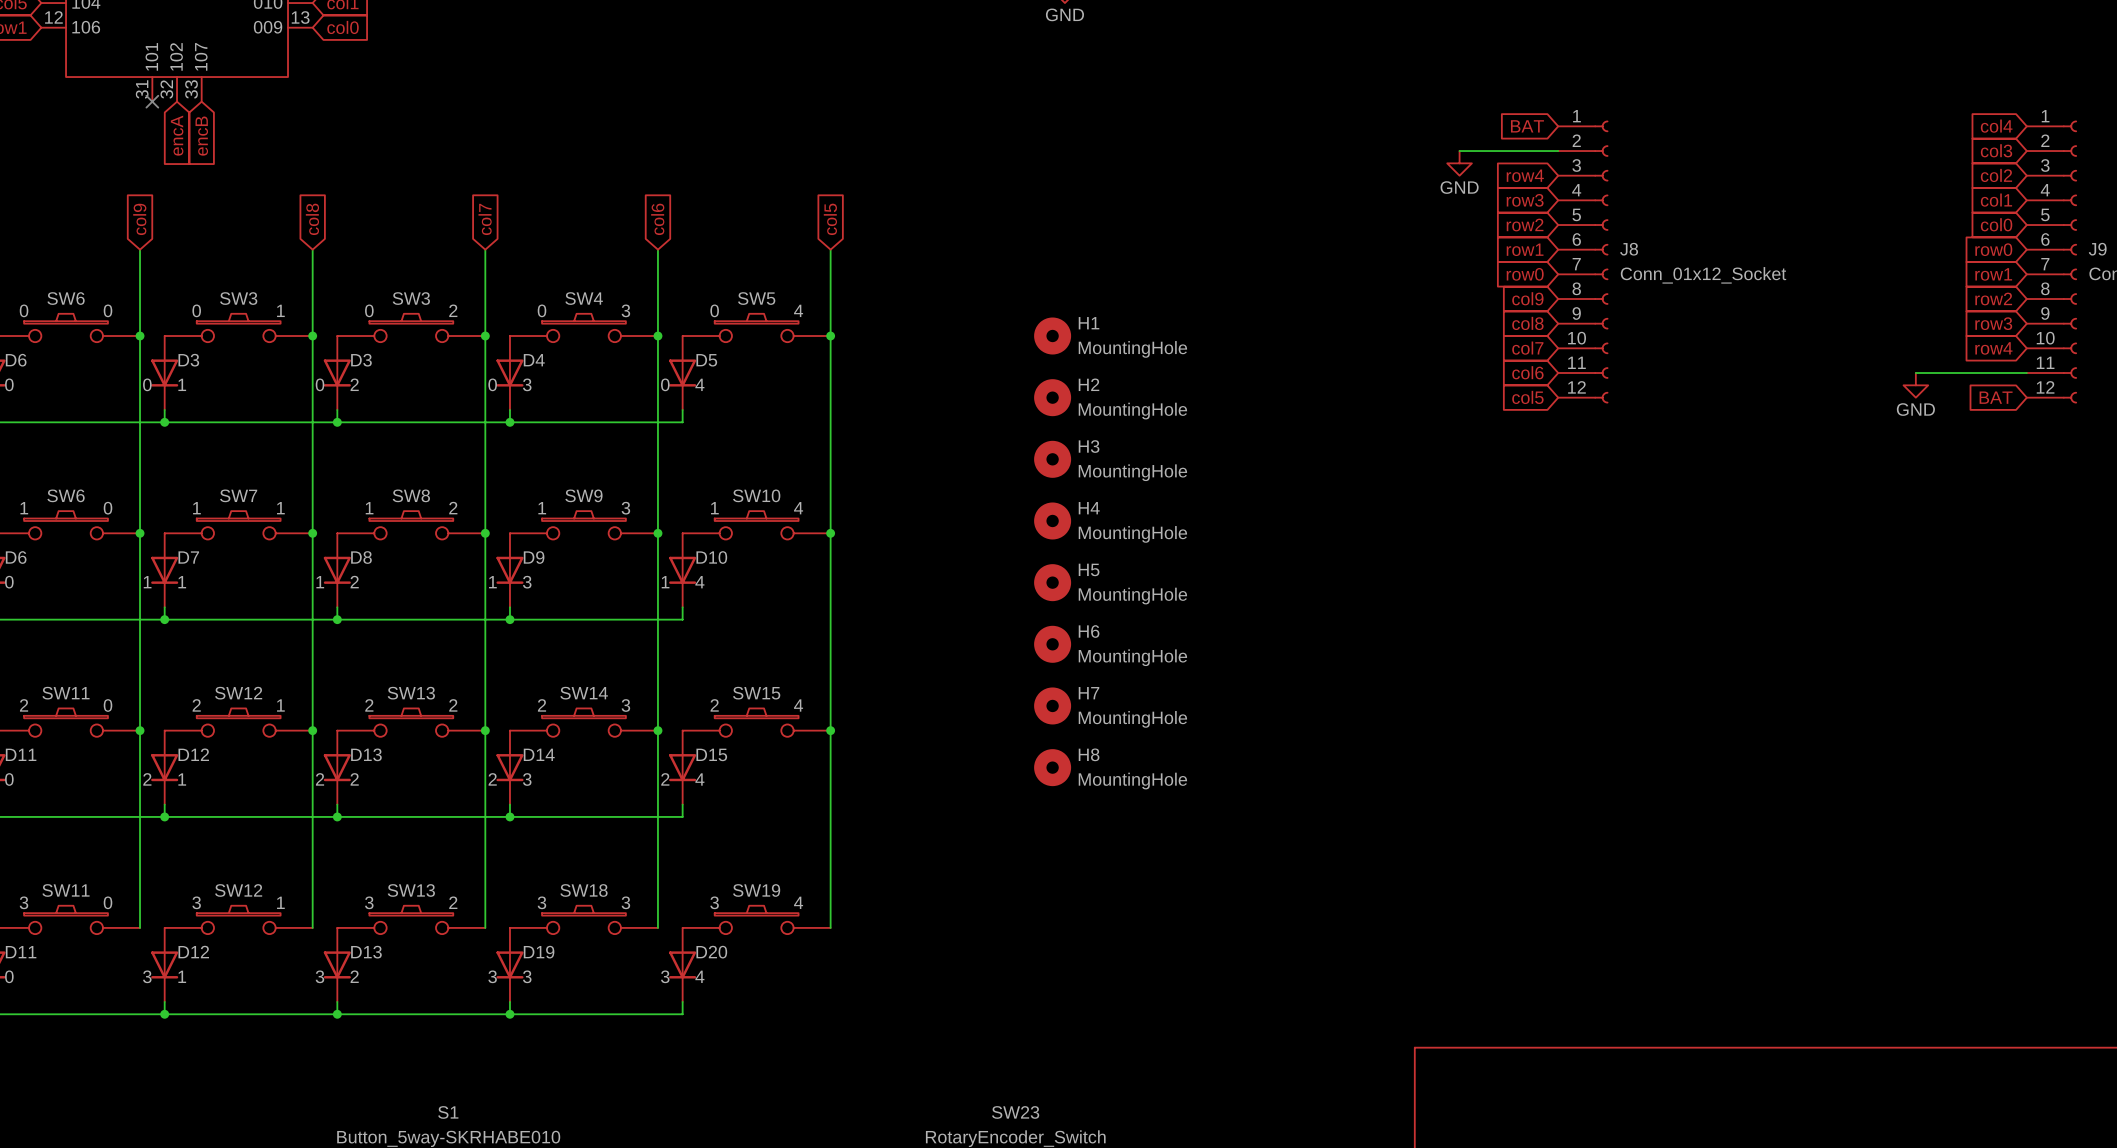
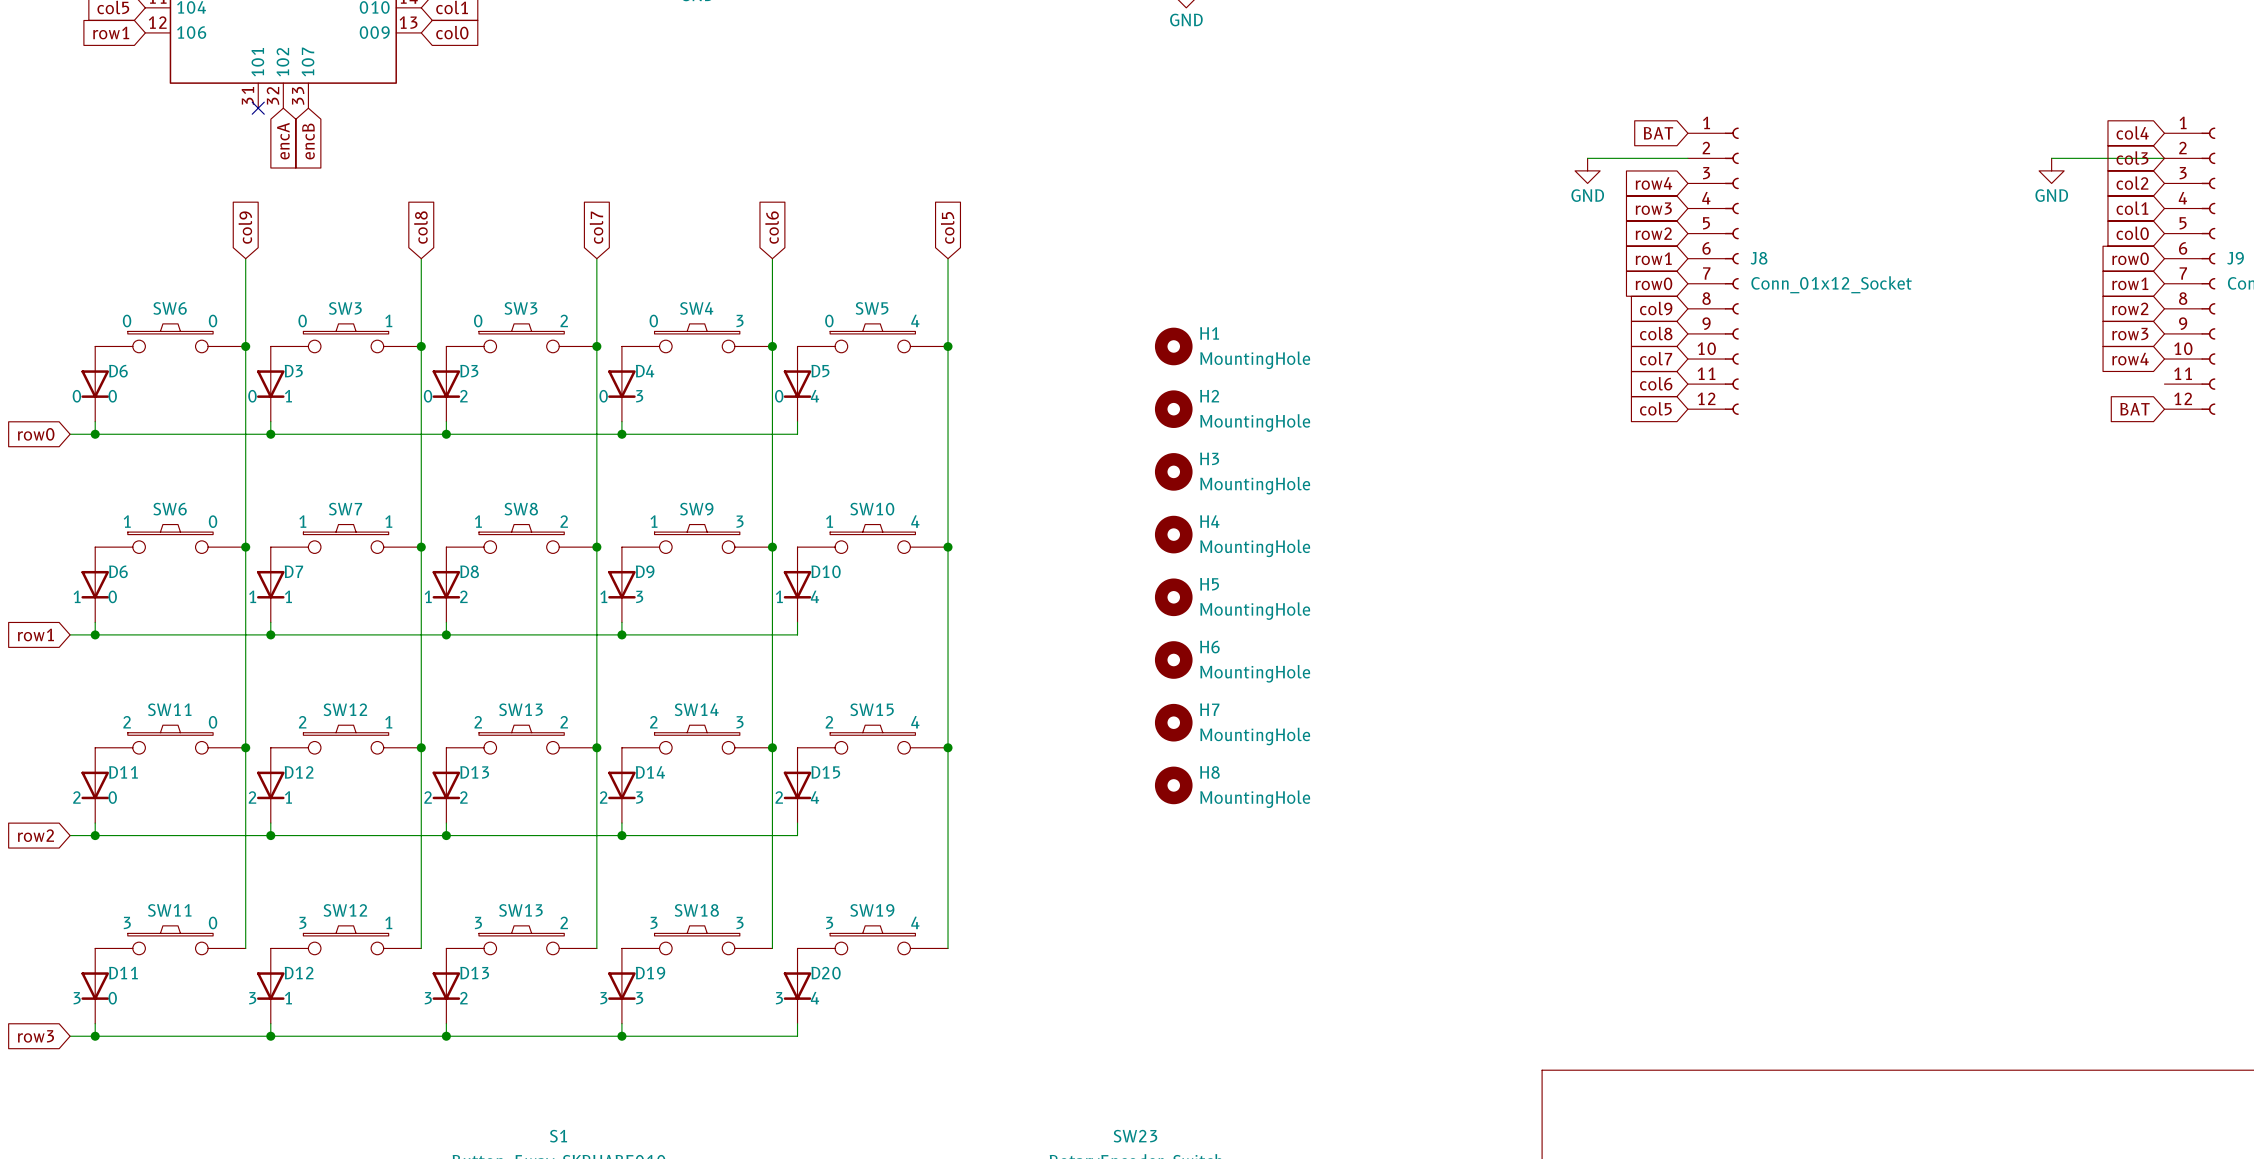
wire: (1915, 373) (2026, 373) -> (2051, 158) (2164, 158)
power symbol position: GND (1915, 385) -> GND (2051, 170)

